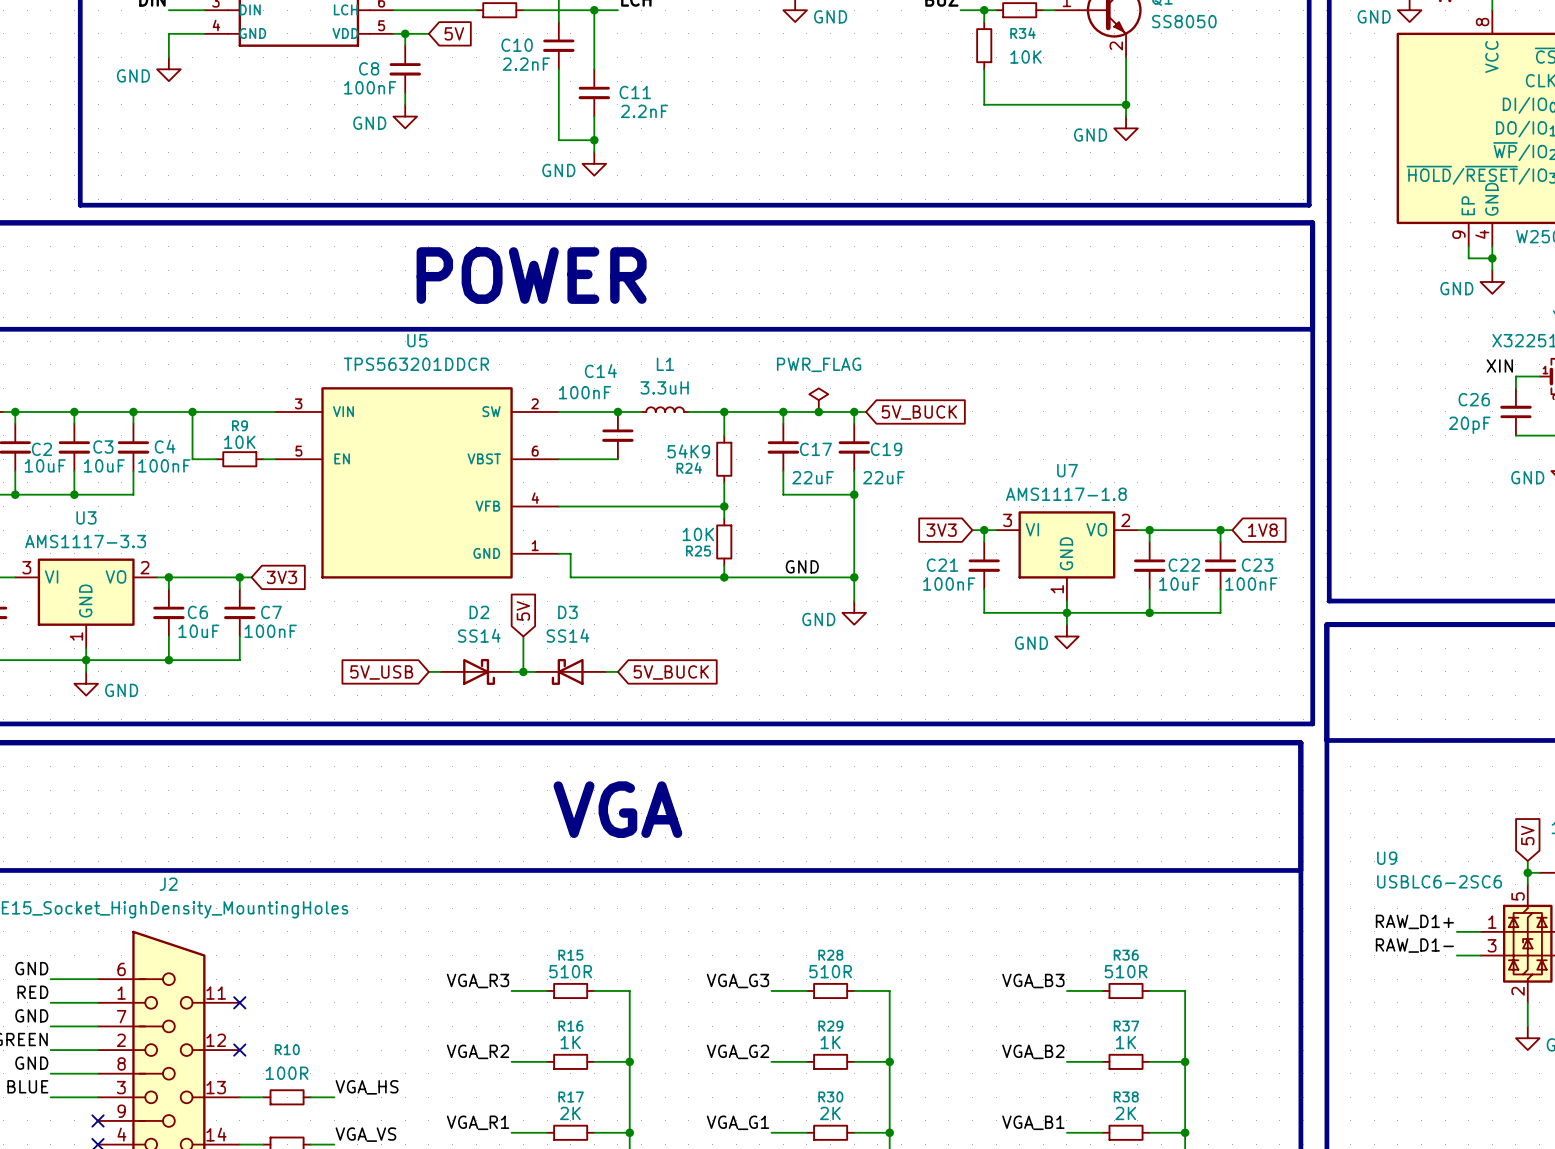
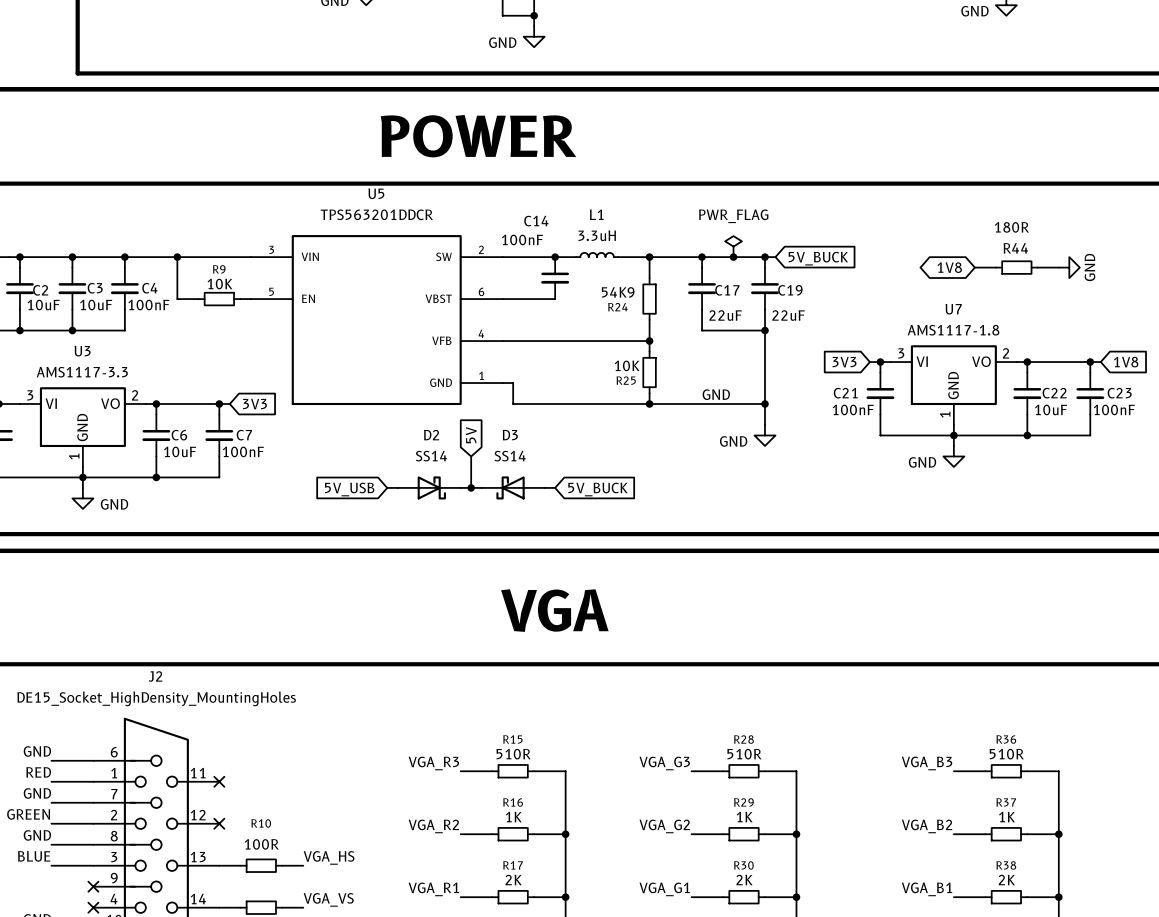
global label: none -> 1V8 (949, 267)
wire: none -> (974, 267) (995, 267)
R44: none -> 180R (1016, 267)
wire: none -> (1037, 267) (1058, 267)
power symbol: none -> GND (1069, 267)

